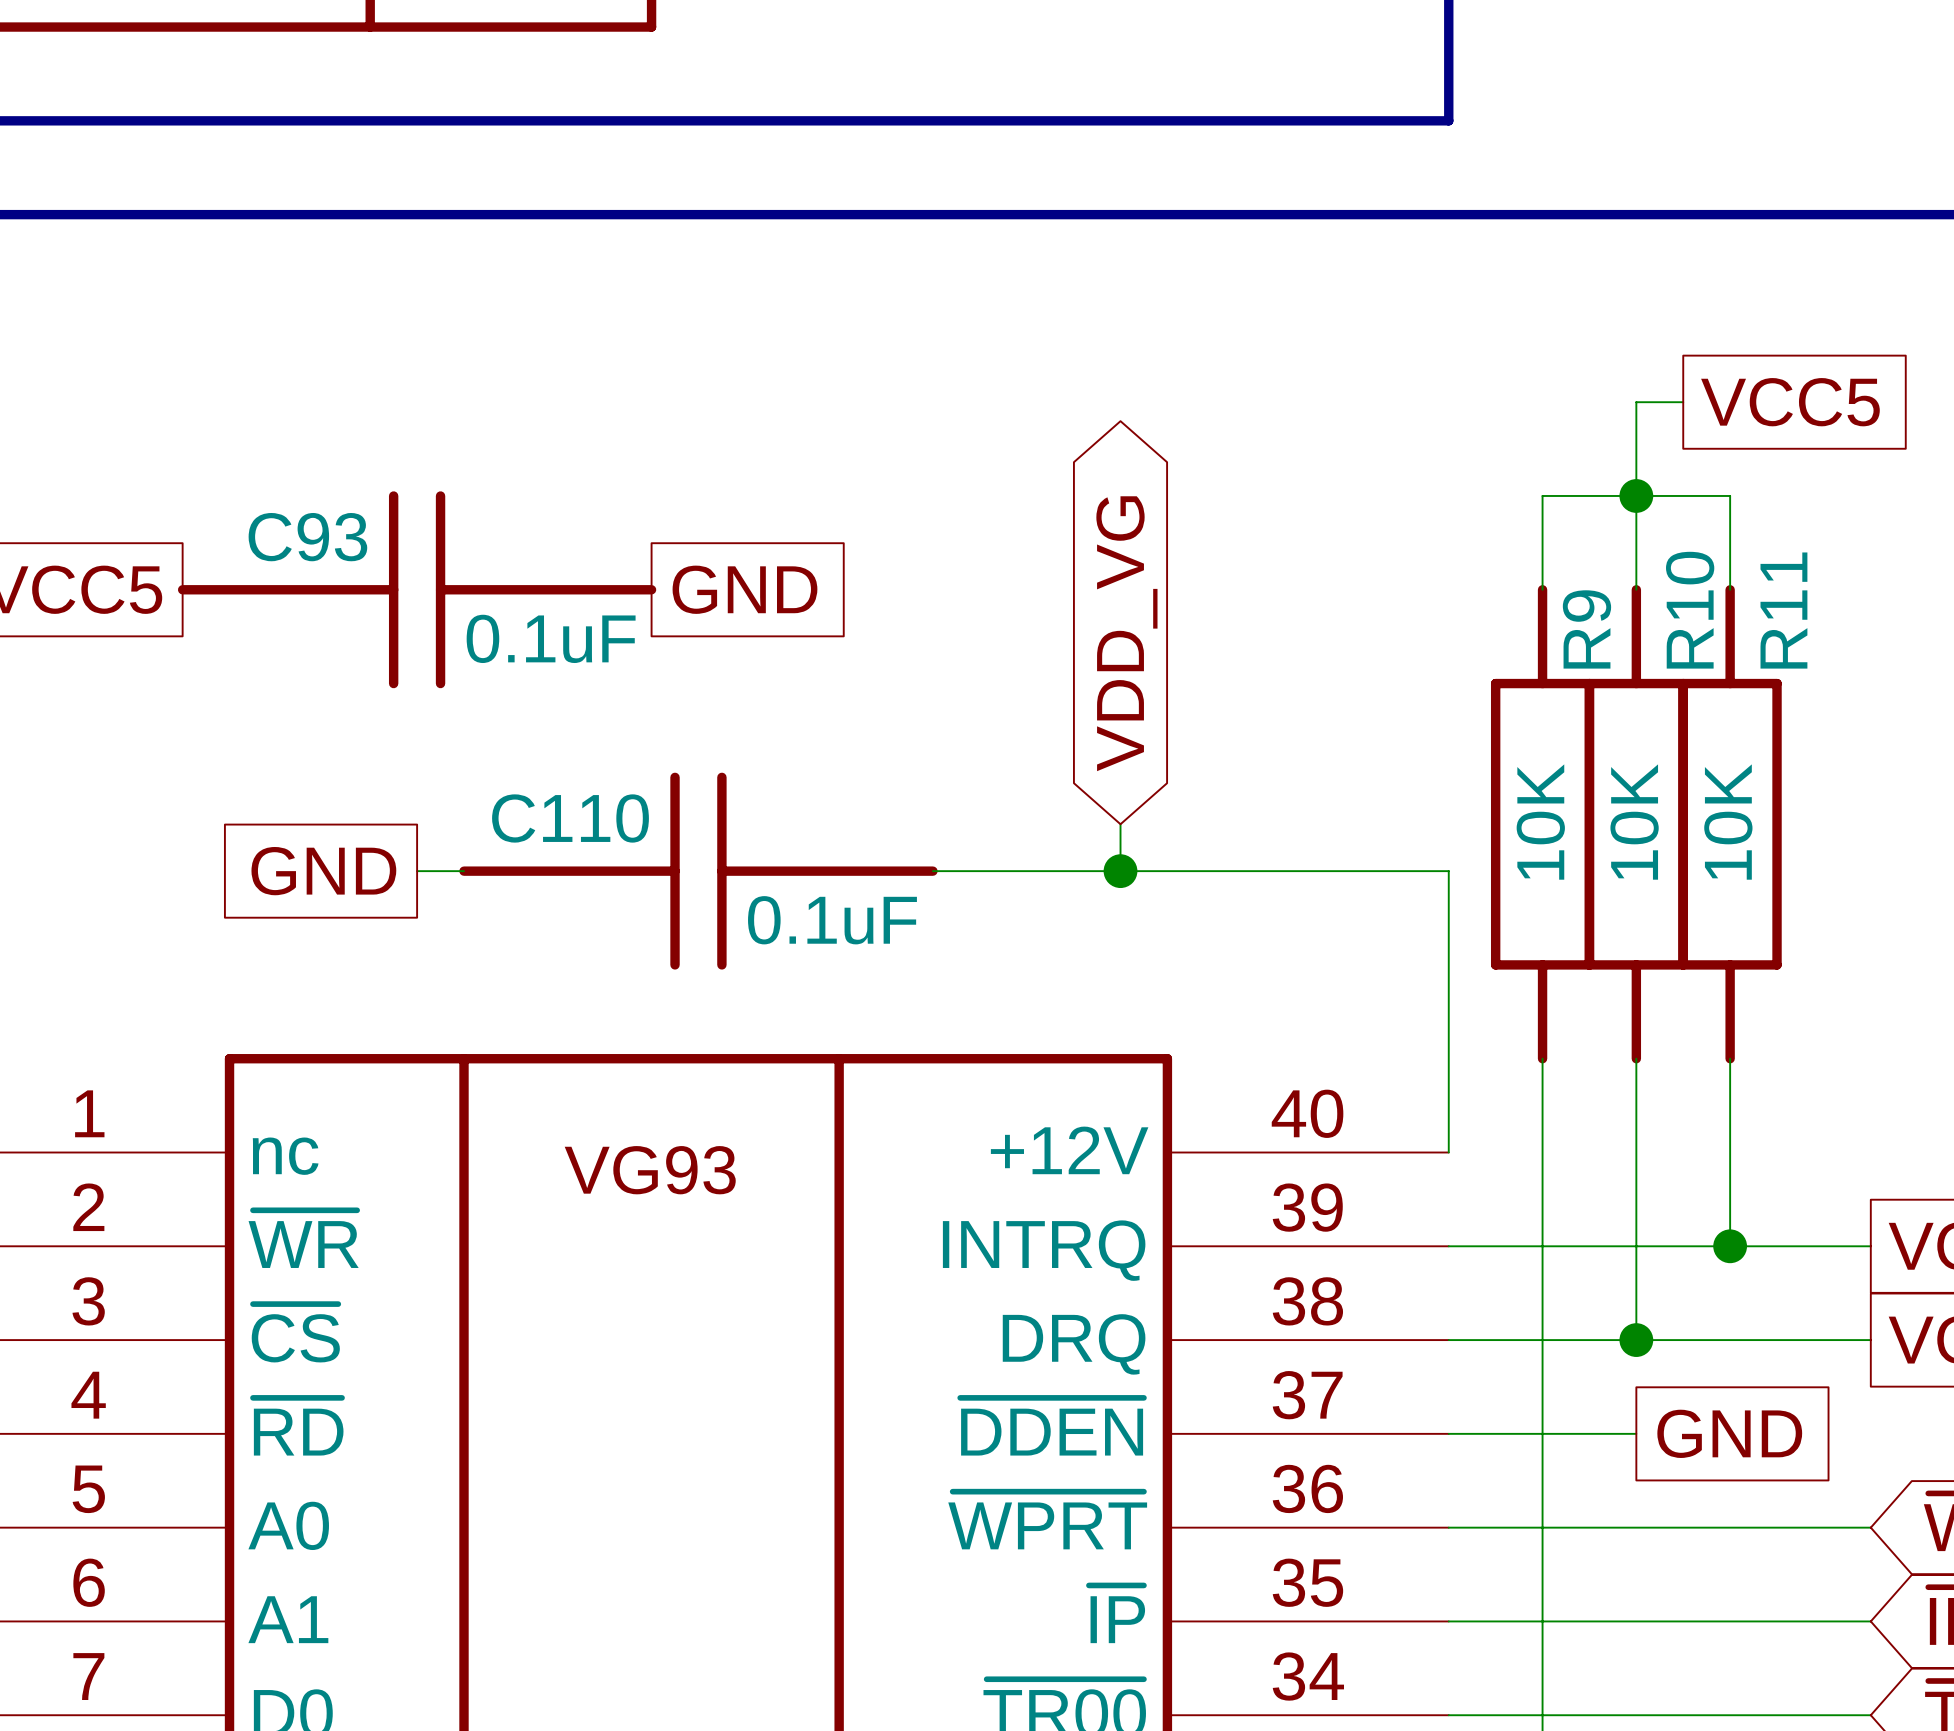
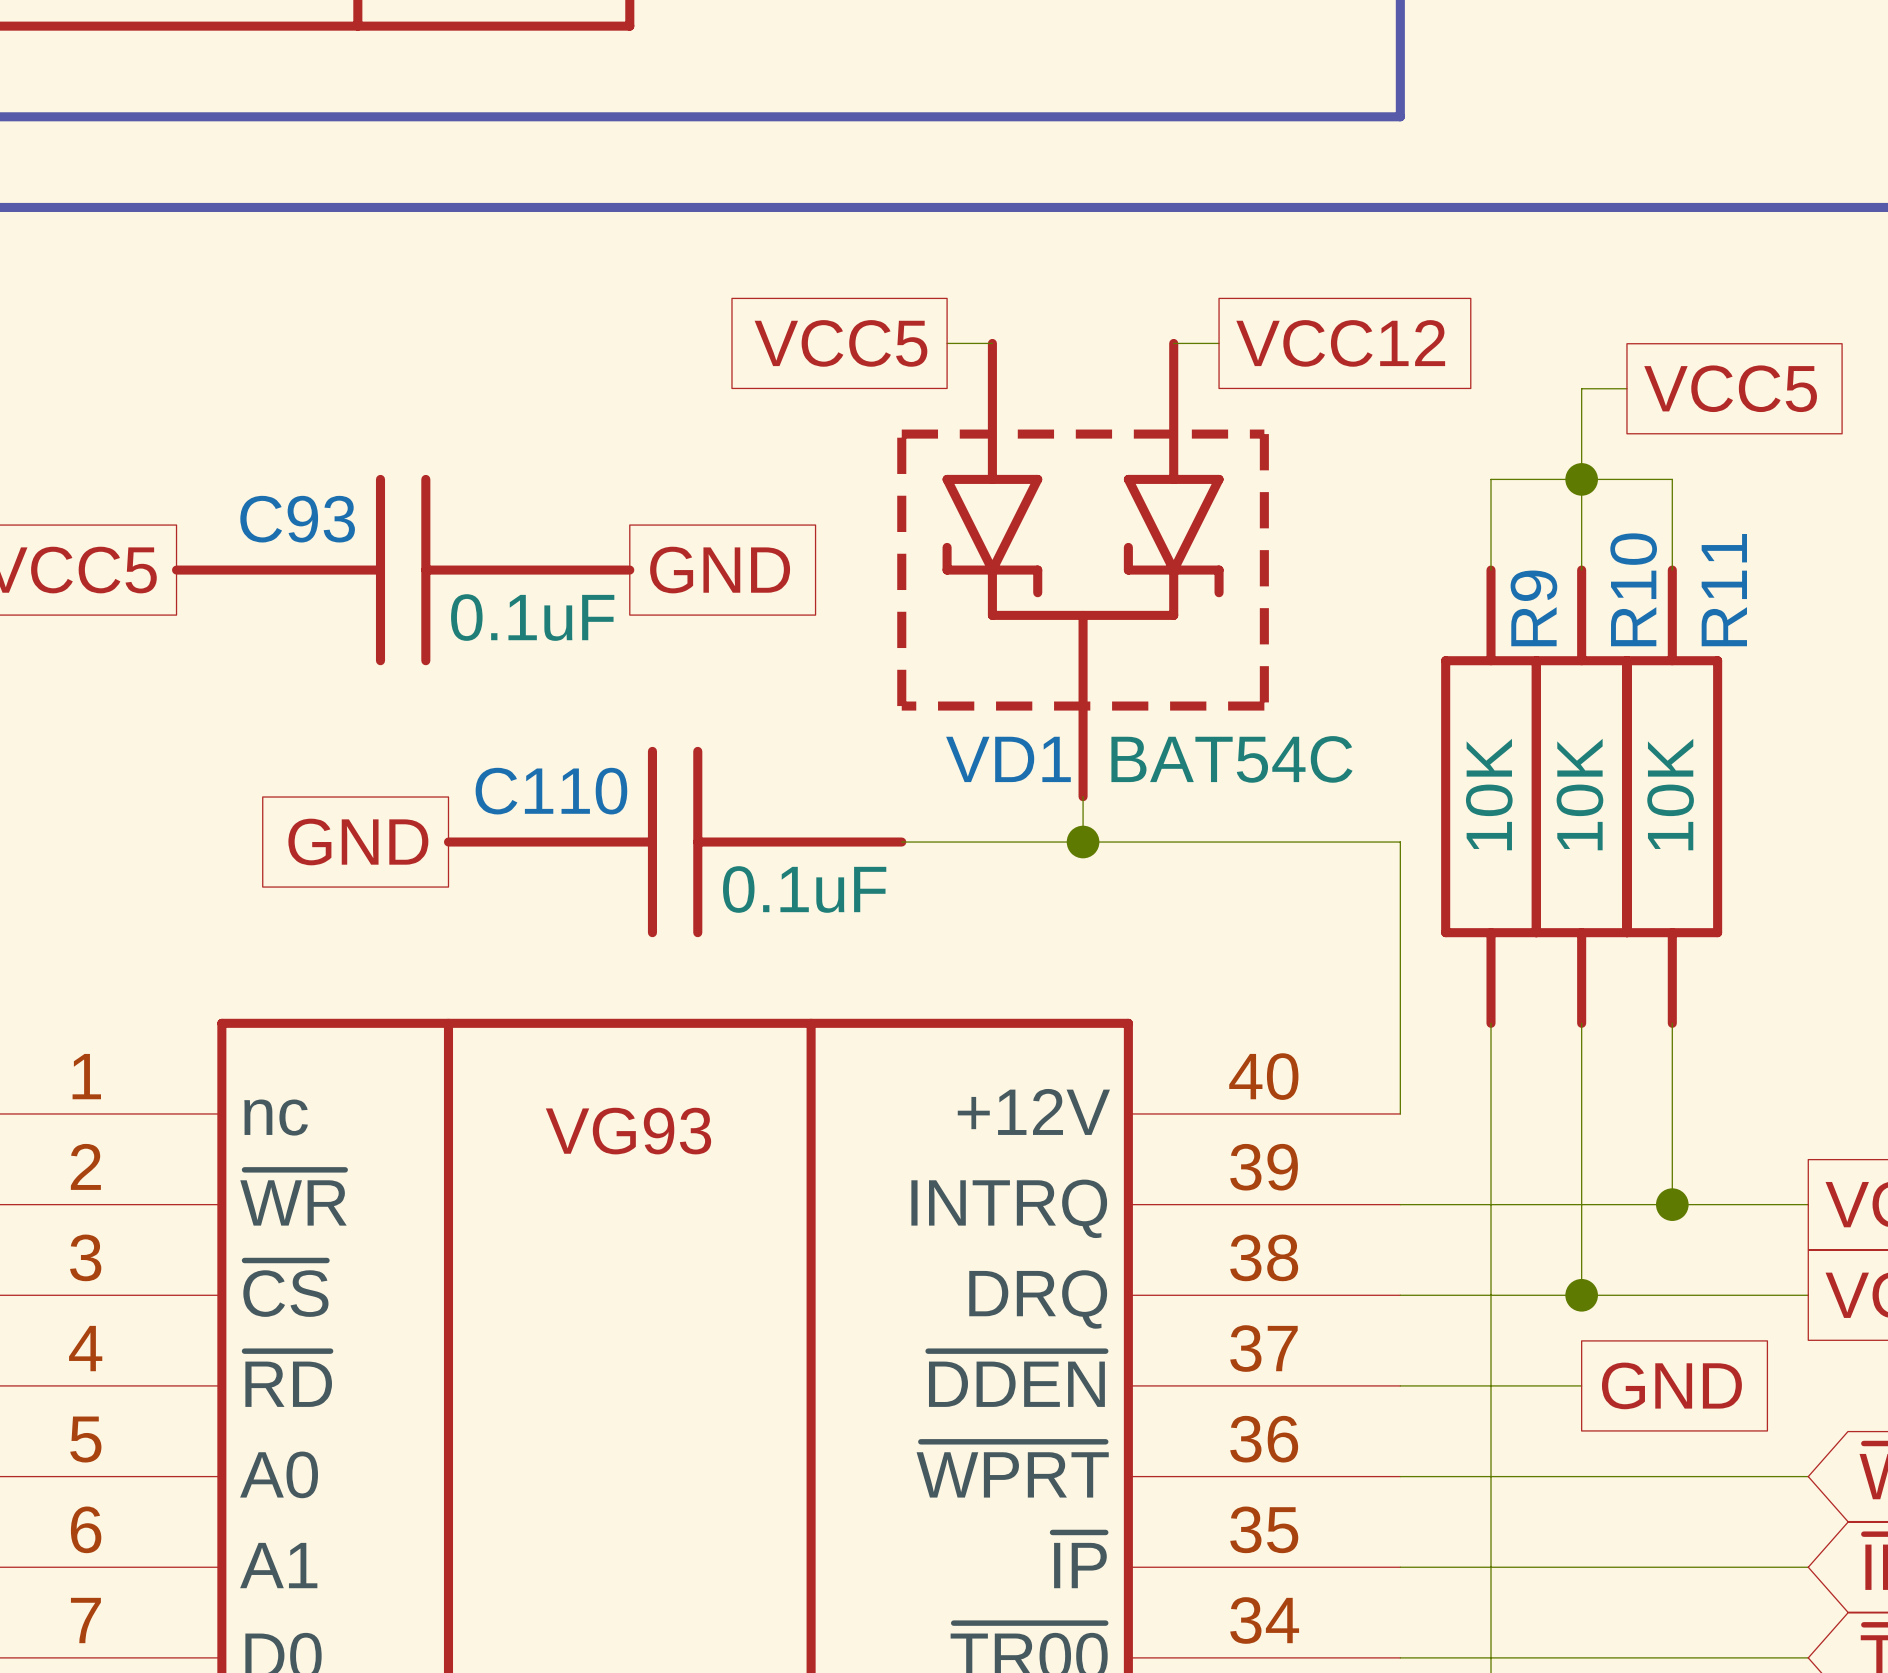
global label: none -> VCC5 (840, 343)
wire: none -> (1173, 343) (1219, 343)
global label: none -> VCC12 (1340, 343)
VD1: none -> BAT54C (1083, 570)
global label: VDD_VG (1126, 633) -> none
global label position: GND (323, 871) -> GND (358, 842)
wire: (417, 871) (464, 871) -> (947, 343) (992, 343)

